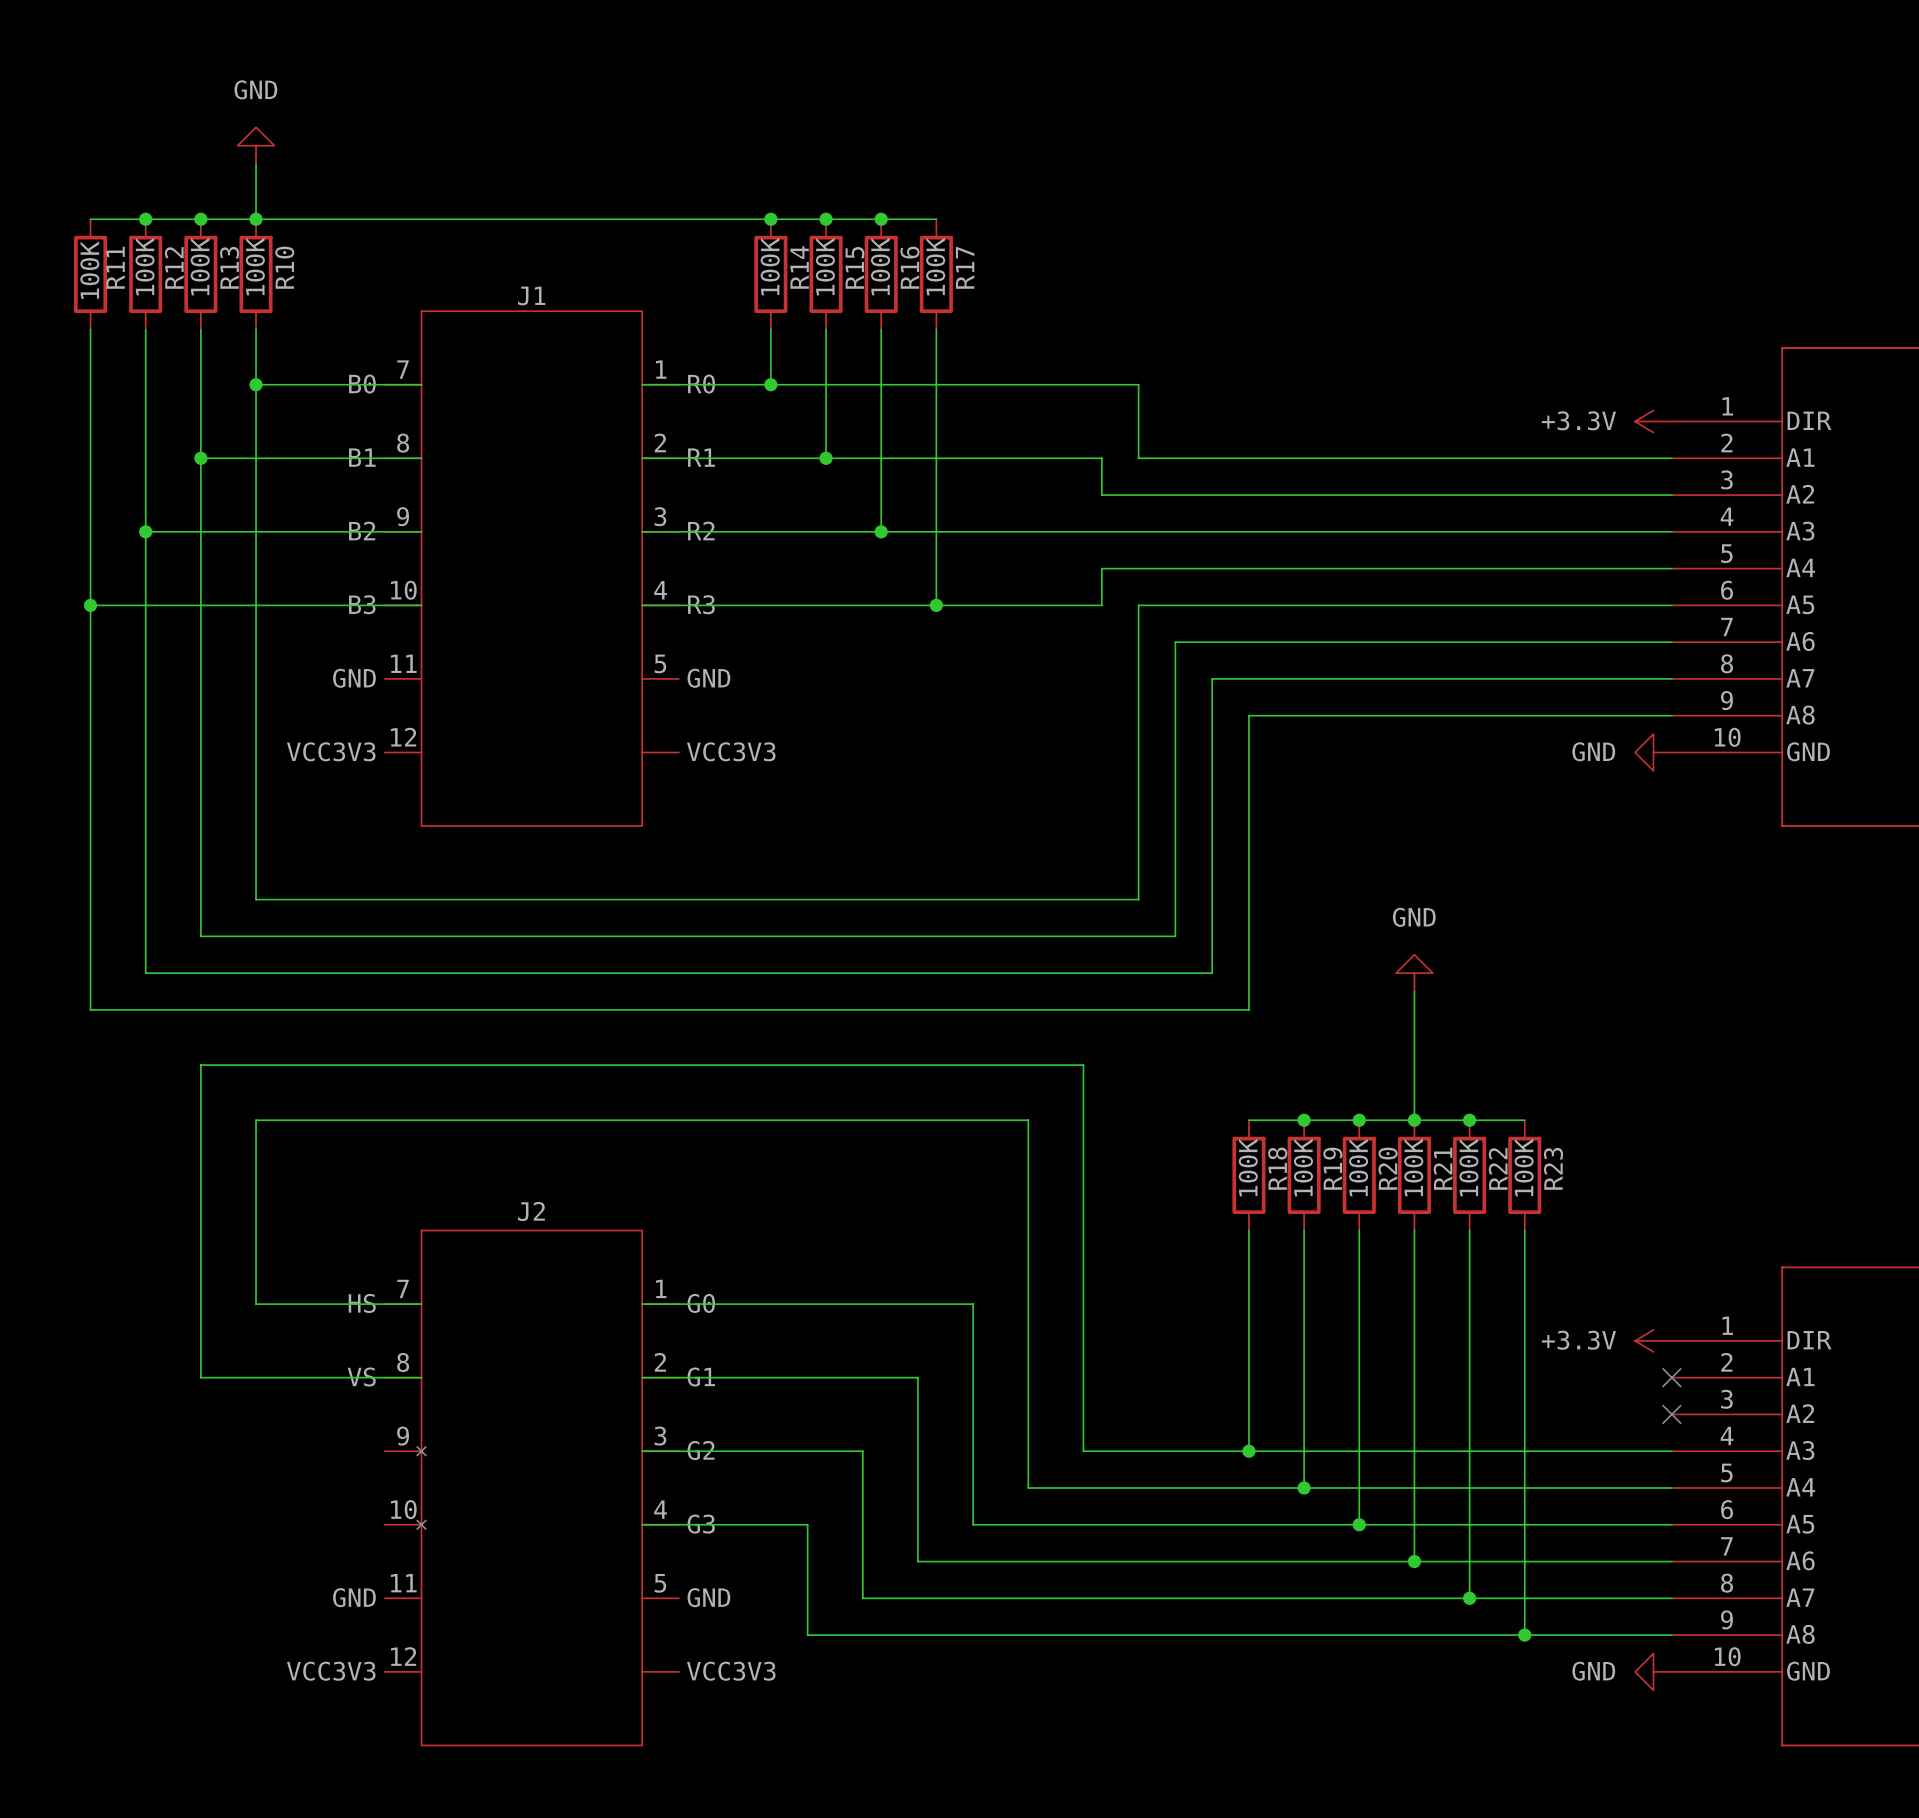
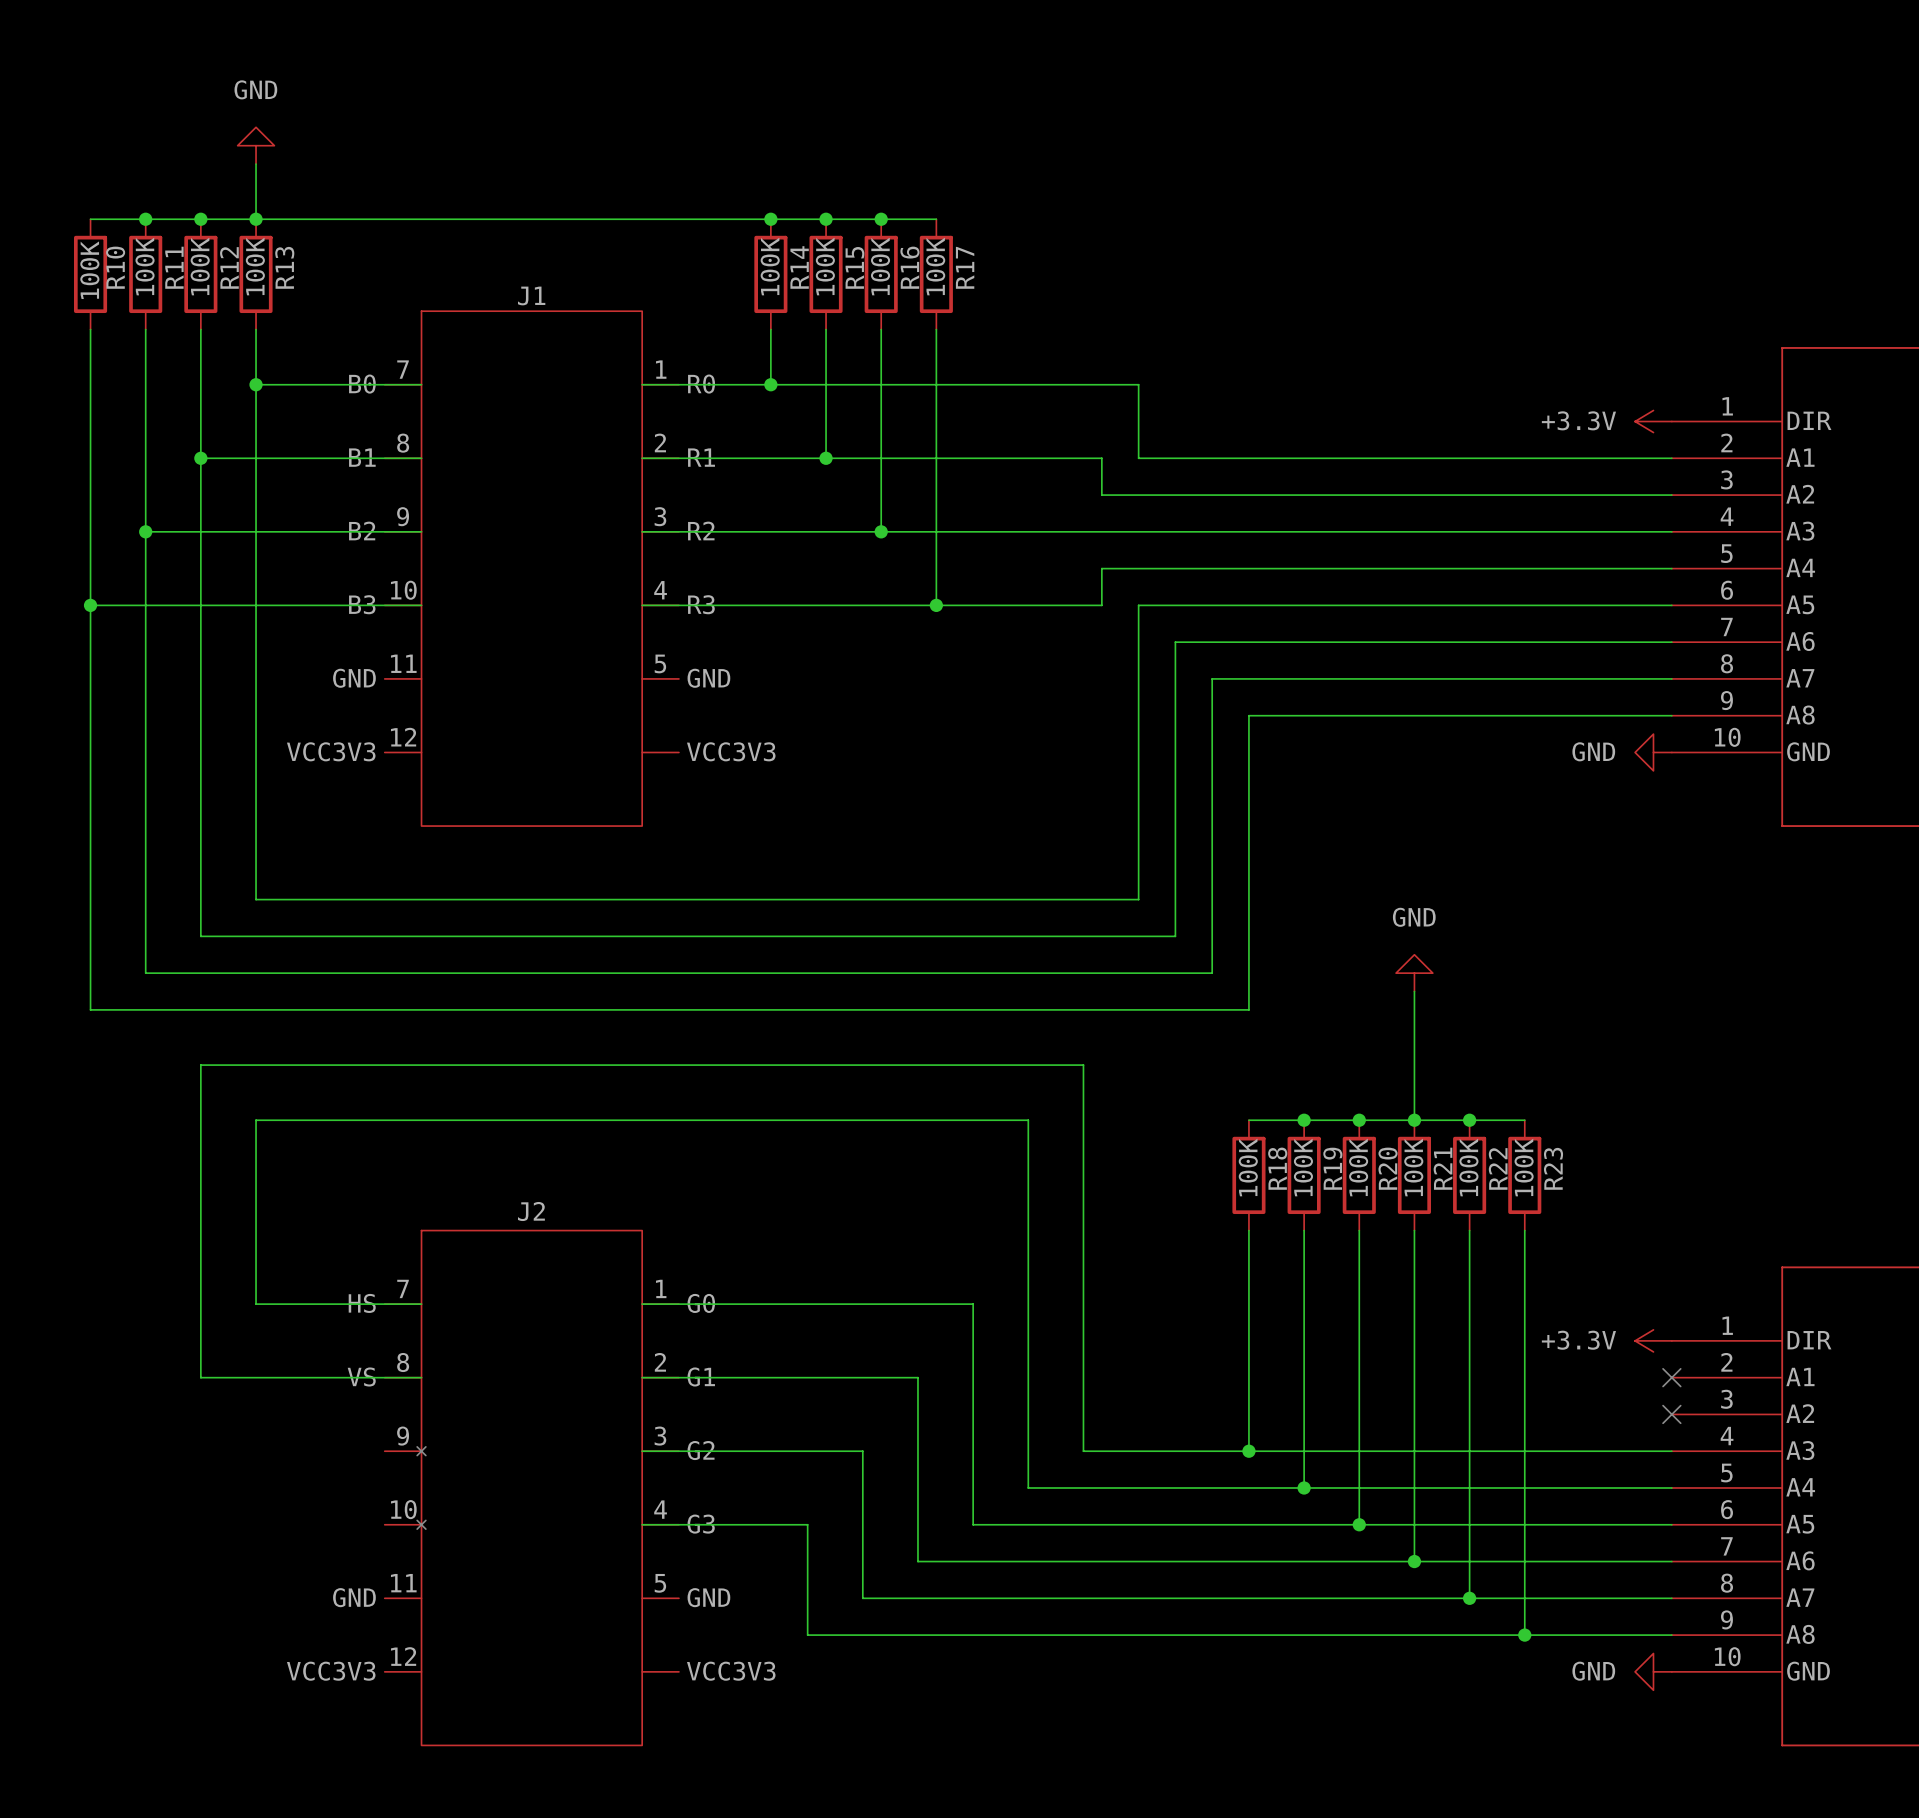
R11 name: R11 (115, 267) -> R10 (115, 267)
R12 name: R12 (174, 267) -> R11 (174, 267)
R13 name: R13 (229, 267) -> R12 (229, 267)
R10 name: R10 (284, 267) -> R13 (284, 267)

